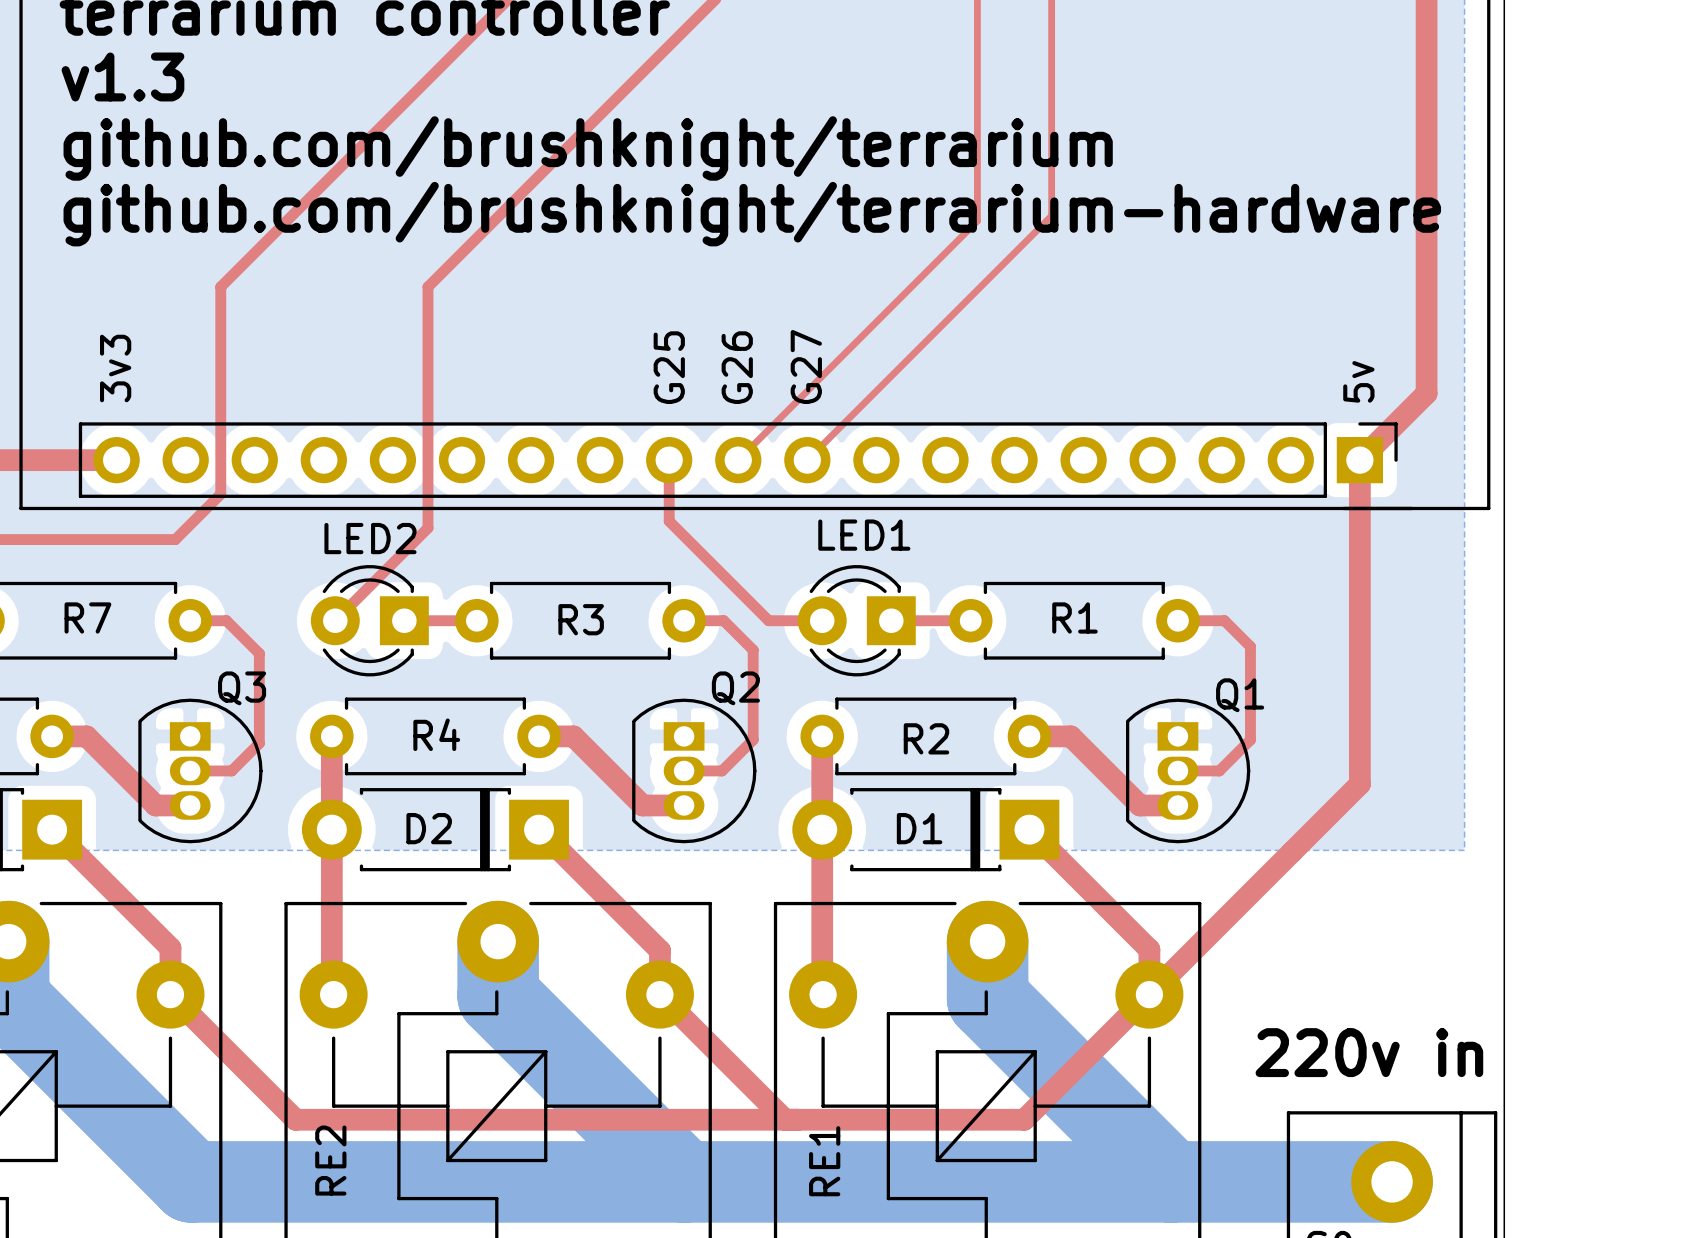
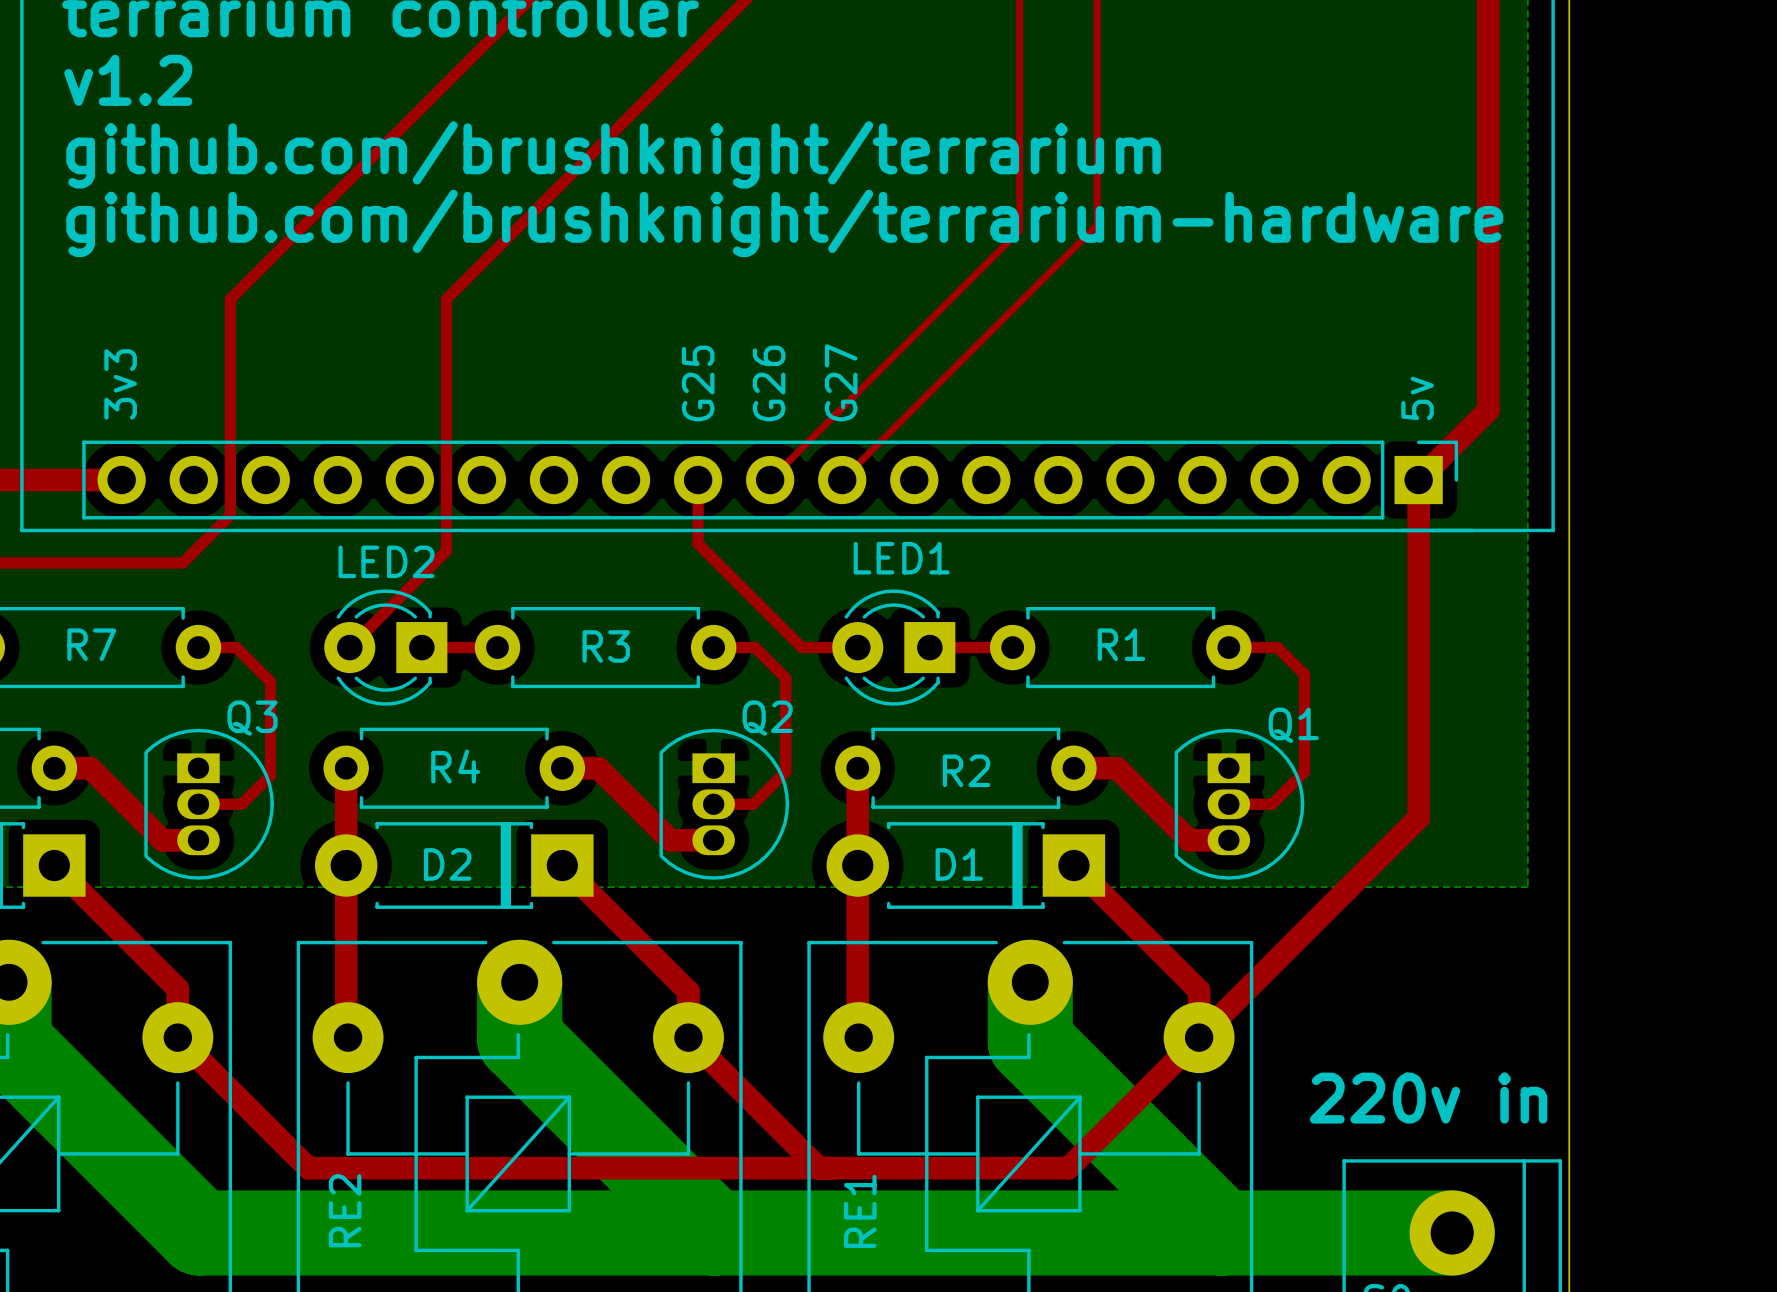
text: v1.3 (122, 76) -> v1.2 (128, 80)

